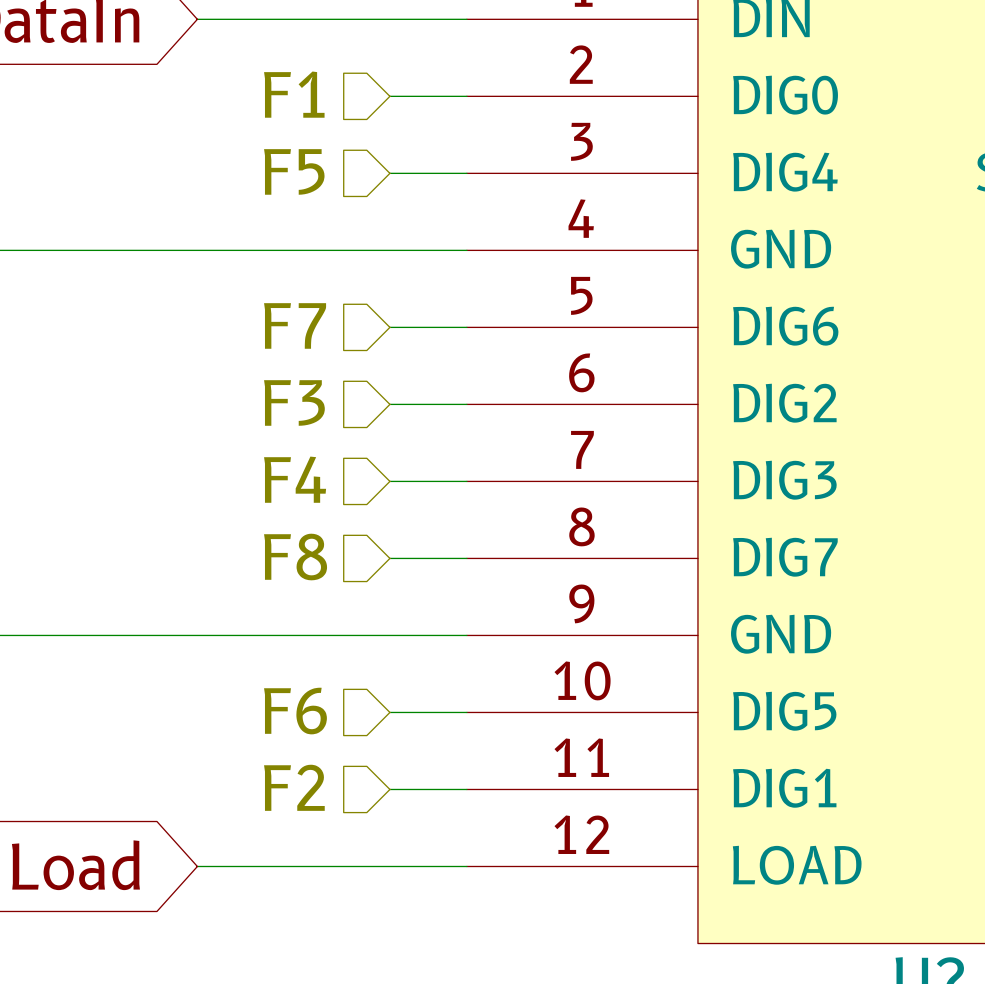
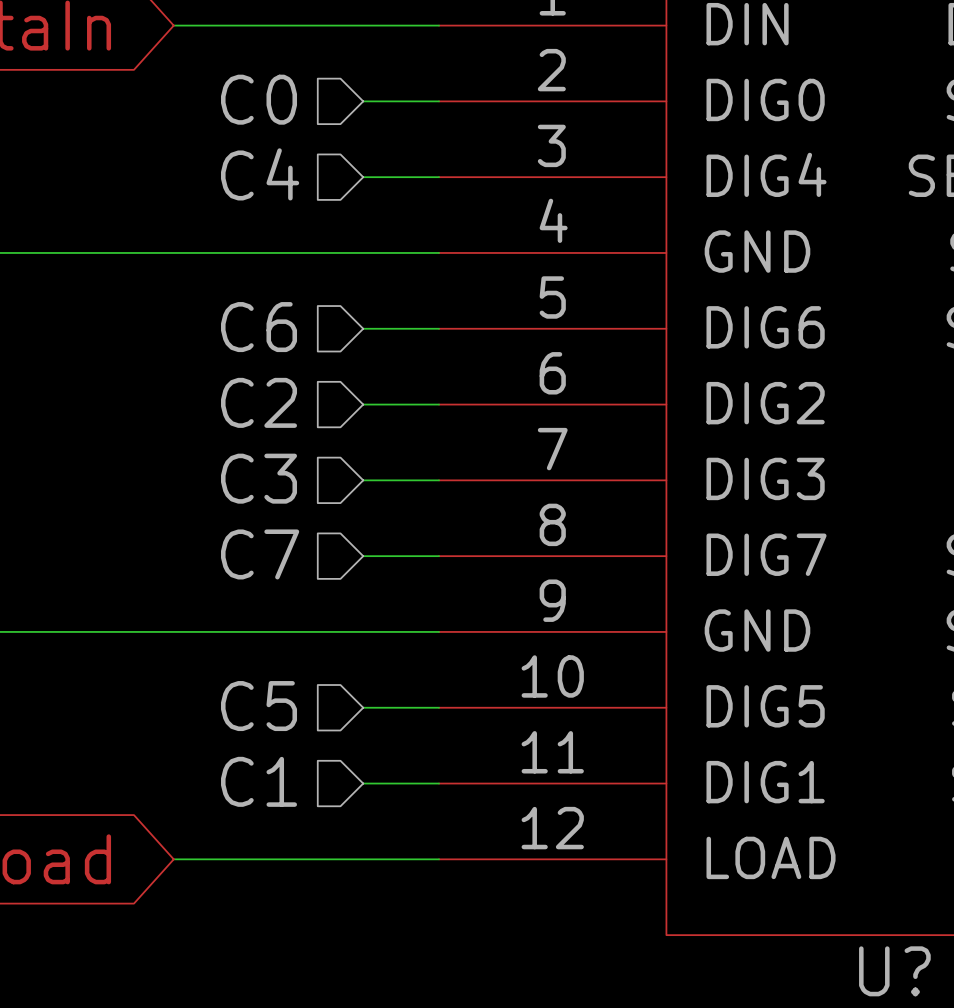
hierarchical label: F1 (294, 94) -> C0 (259, 99)
hierarchical label: F5 (294, 171) -> C4 (260, 174)
hierarchical label: F7 (295, 325) -> C6 (259, 327)
hierarchical label: F3 (294, 402) -> C2 (259, 402)
hierarchical label: F4 (295, 479) -> C3 (259, 478)
hierarchical label: F8 (295, 557) -> C7 (260, 554)
hierarchical label: F6 (295, 711) -> C5 (259, 706)
hierarchical label: F2 (294, 787) -> C1 (259, 781)

